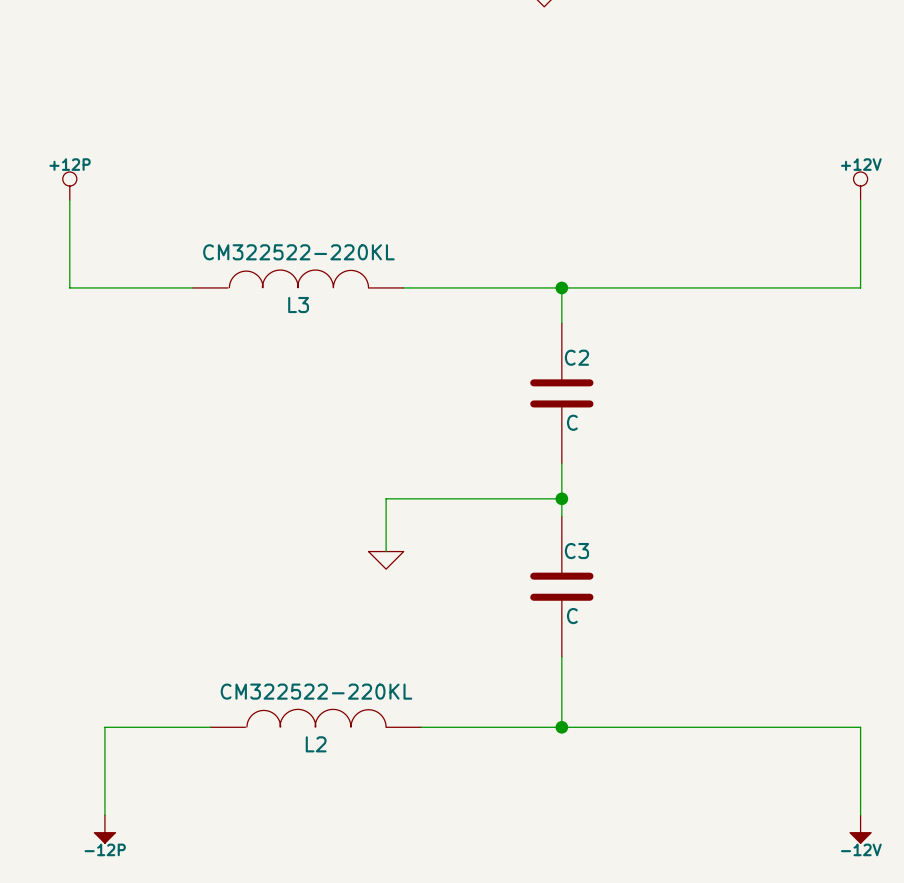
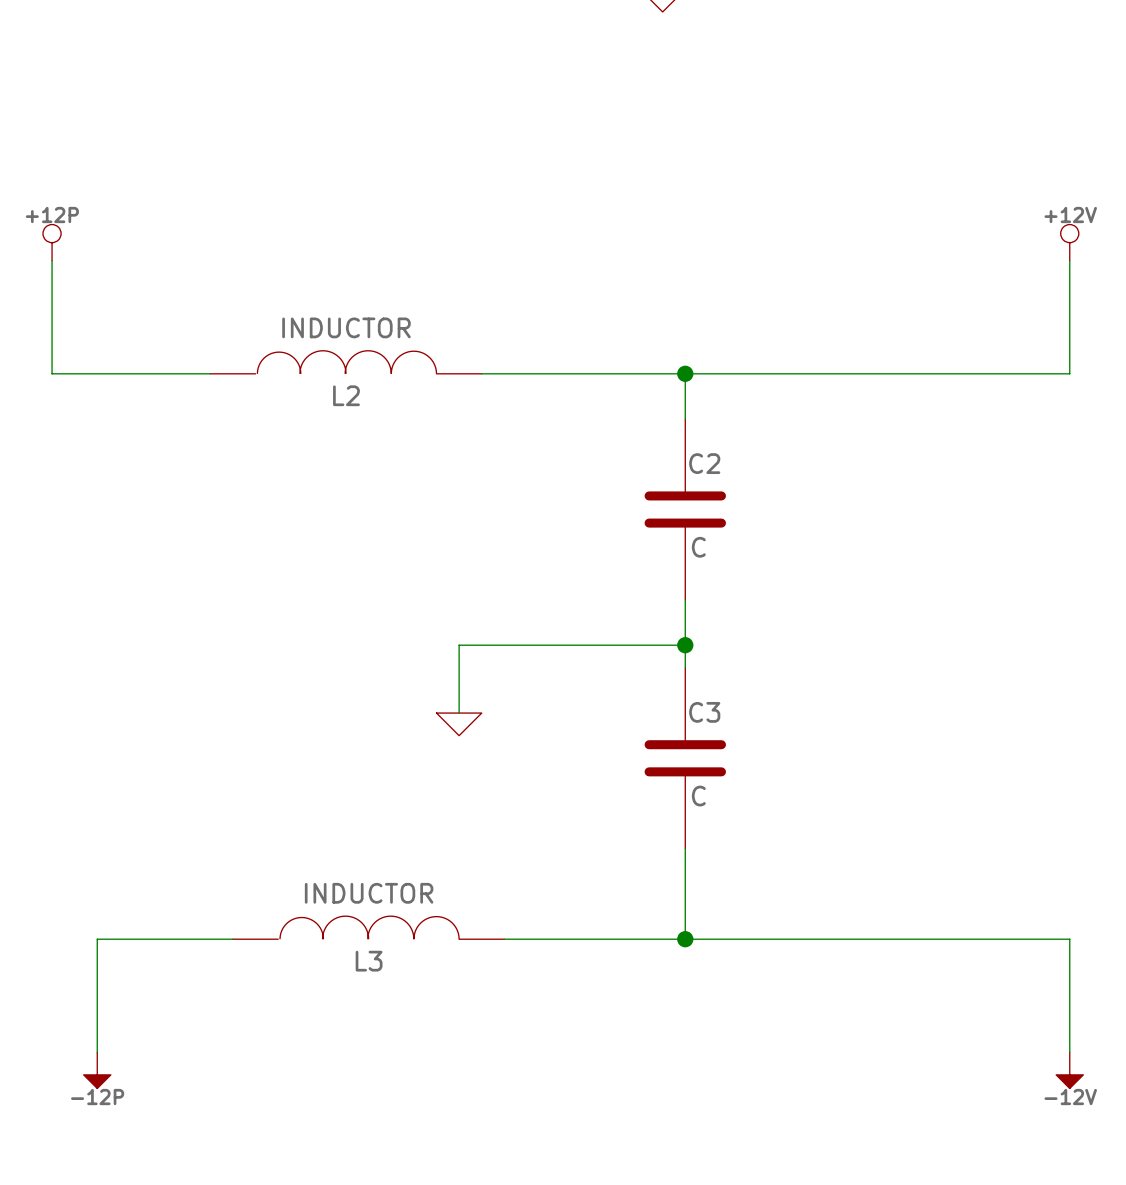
L3 value: CM322522-220KL (298, 252) -> INDUCTOR (346, 327)
L3 name: L3 (298, 305) -> L2 (346, 395)
L2 value: CM322522-220KL (316, 691) -> INDUCTOR (369, 893)
L2 name: L2 (316, 744) -> L3 (369, 961)

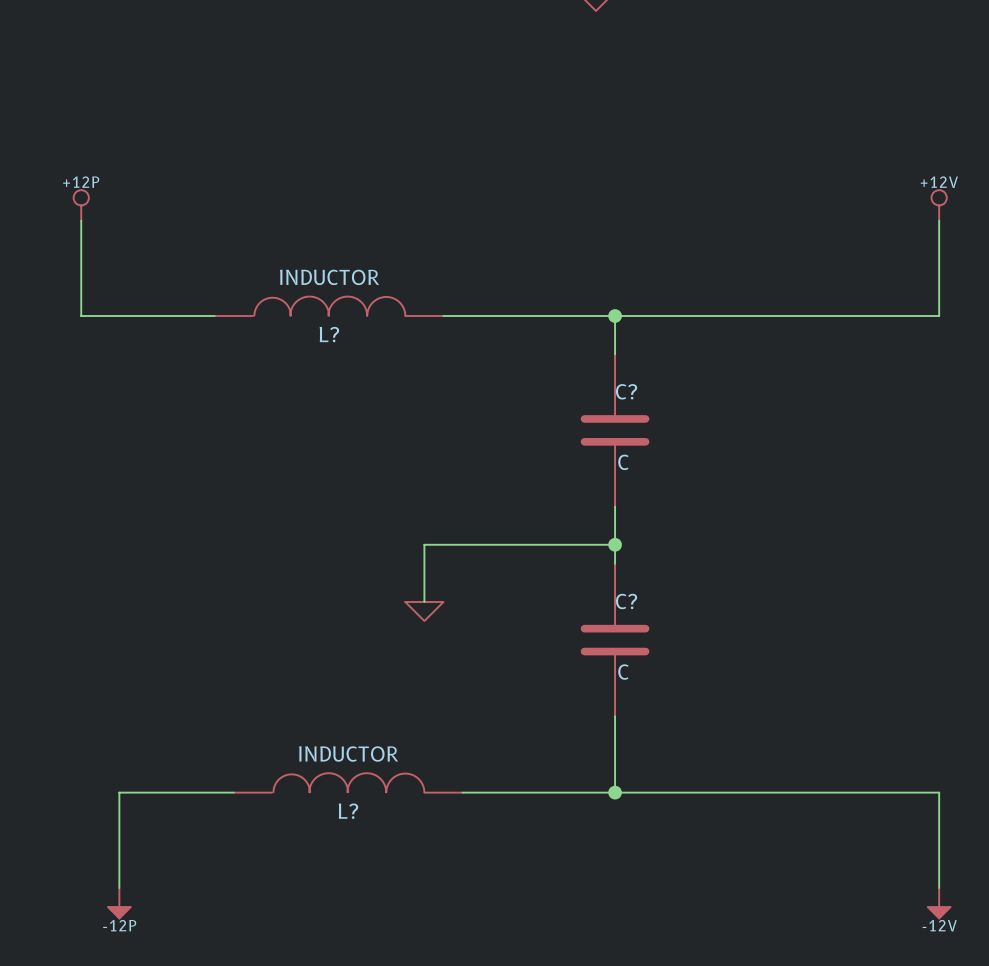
L2 name: L2 (346, 395) -> L? (329, 334)
C2 name: C2 (704, 463) -> C? (626, 391)
C3 name: C3 (704, 712) -> C? (626, 601)
L3 name: L3 (369, 961) -> L? (348, 811)

